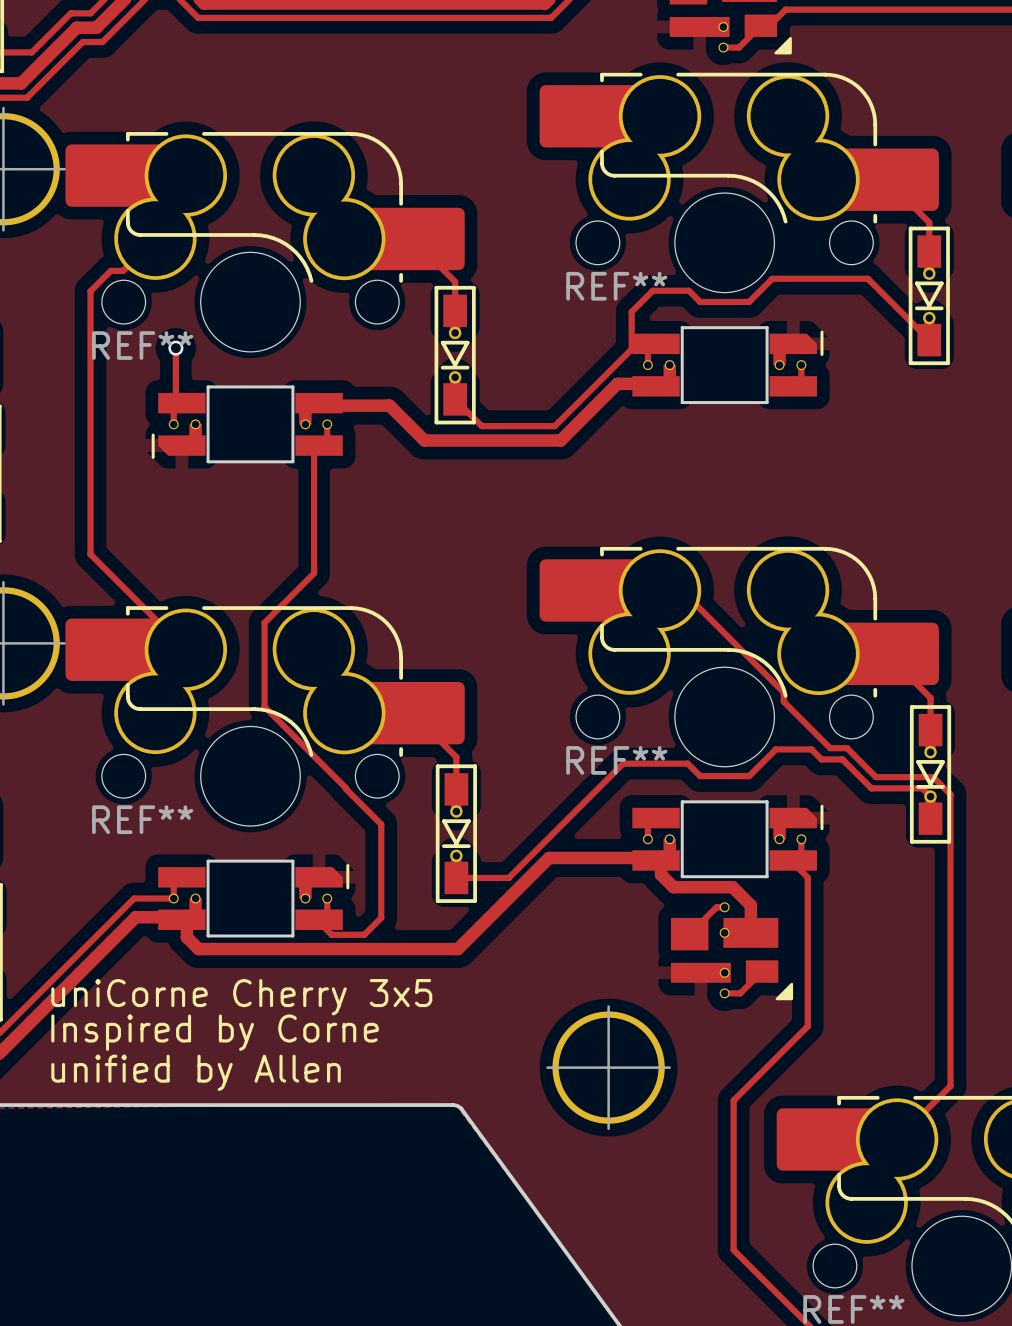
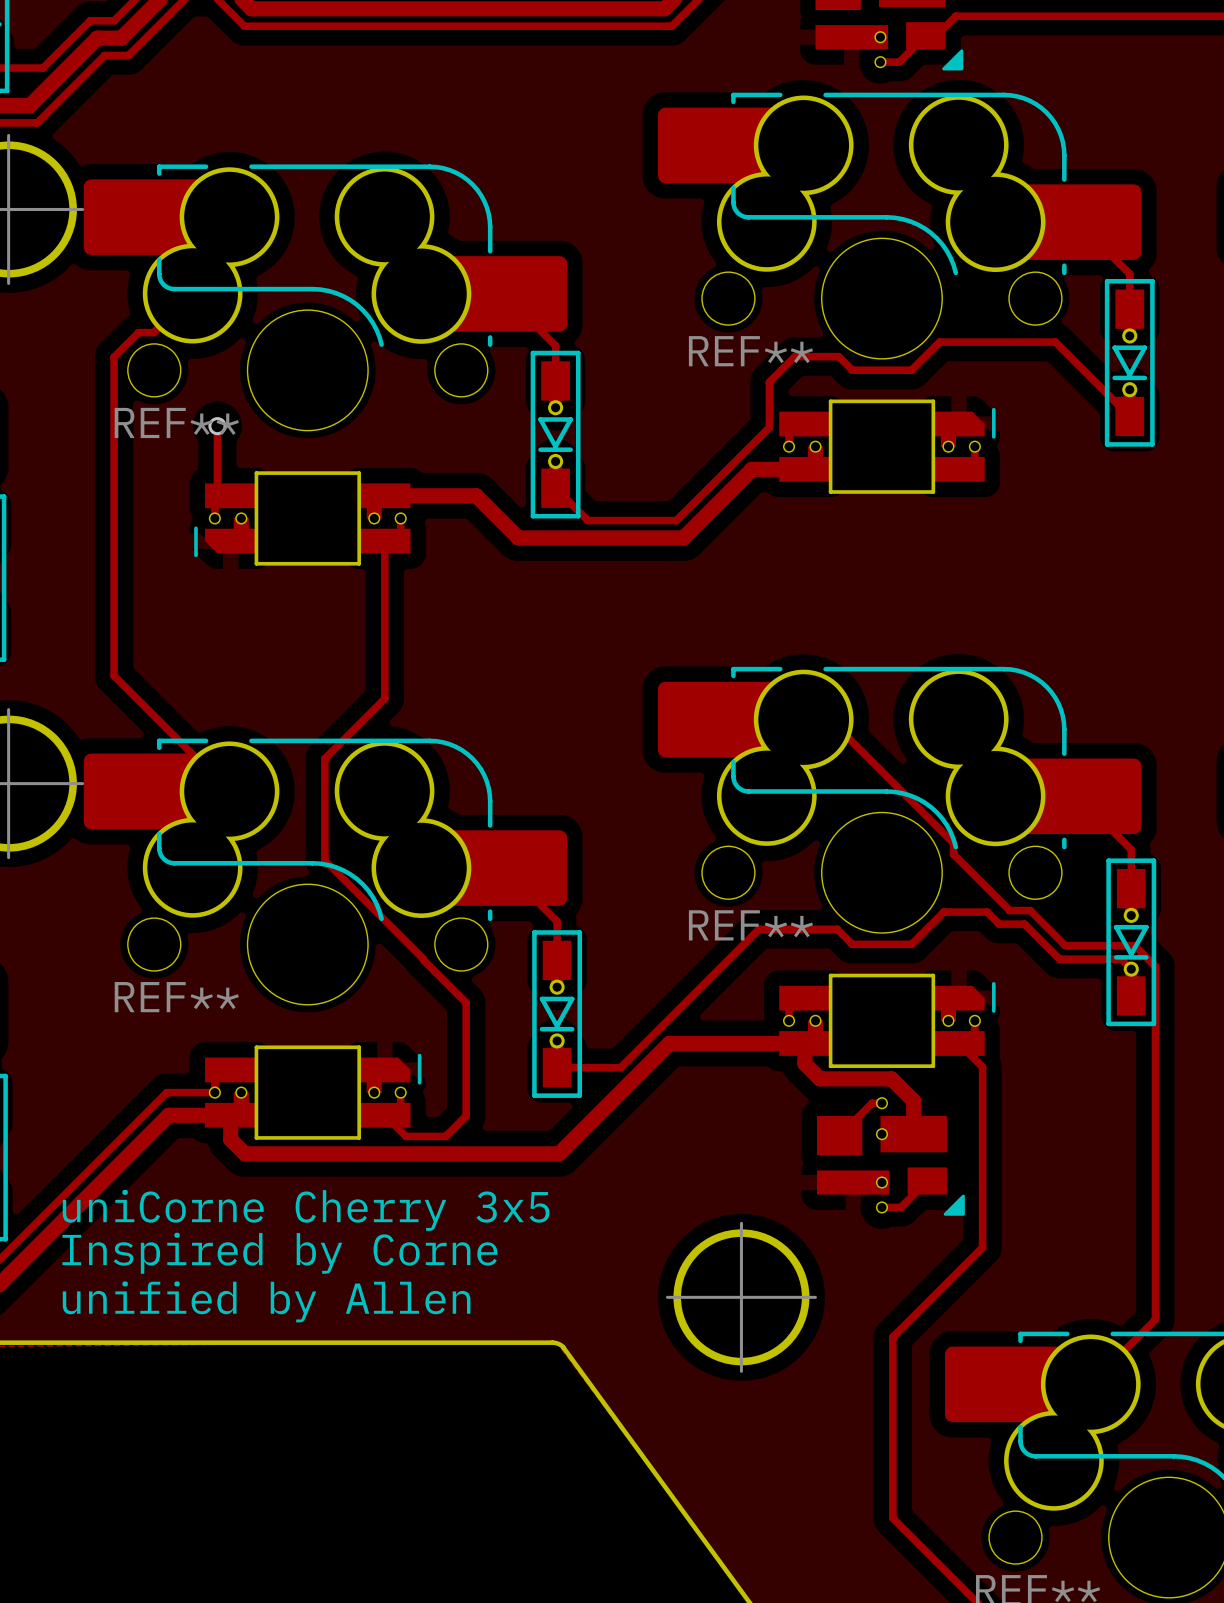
part footprint: [632, 326, 824, 405] -> [779, 399, 996, 494]
part footprint: [151, 385, 343, 464] -> [194, 471, 411, 566]
part footprint: [632, 800, 824, 879] -> [779, 973, 996, 1068]
part footprint: [158, 859, 350, 938] -> [205, 1045, 422, 1140]

